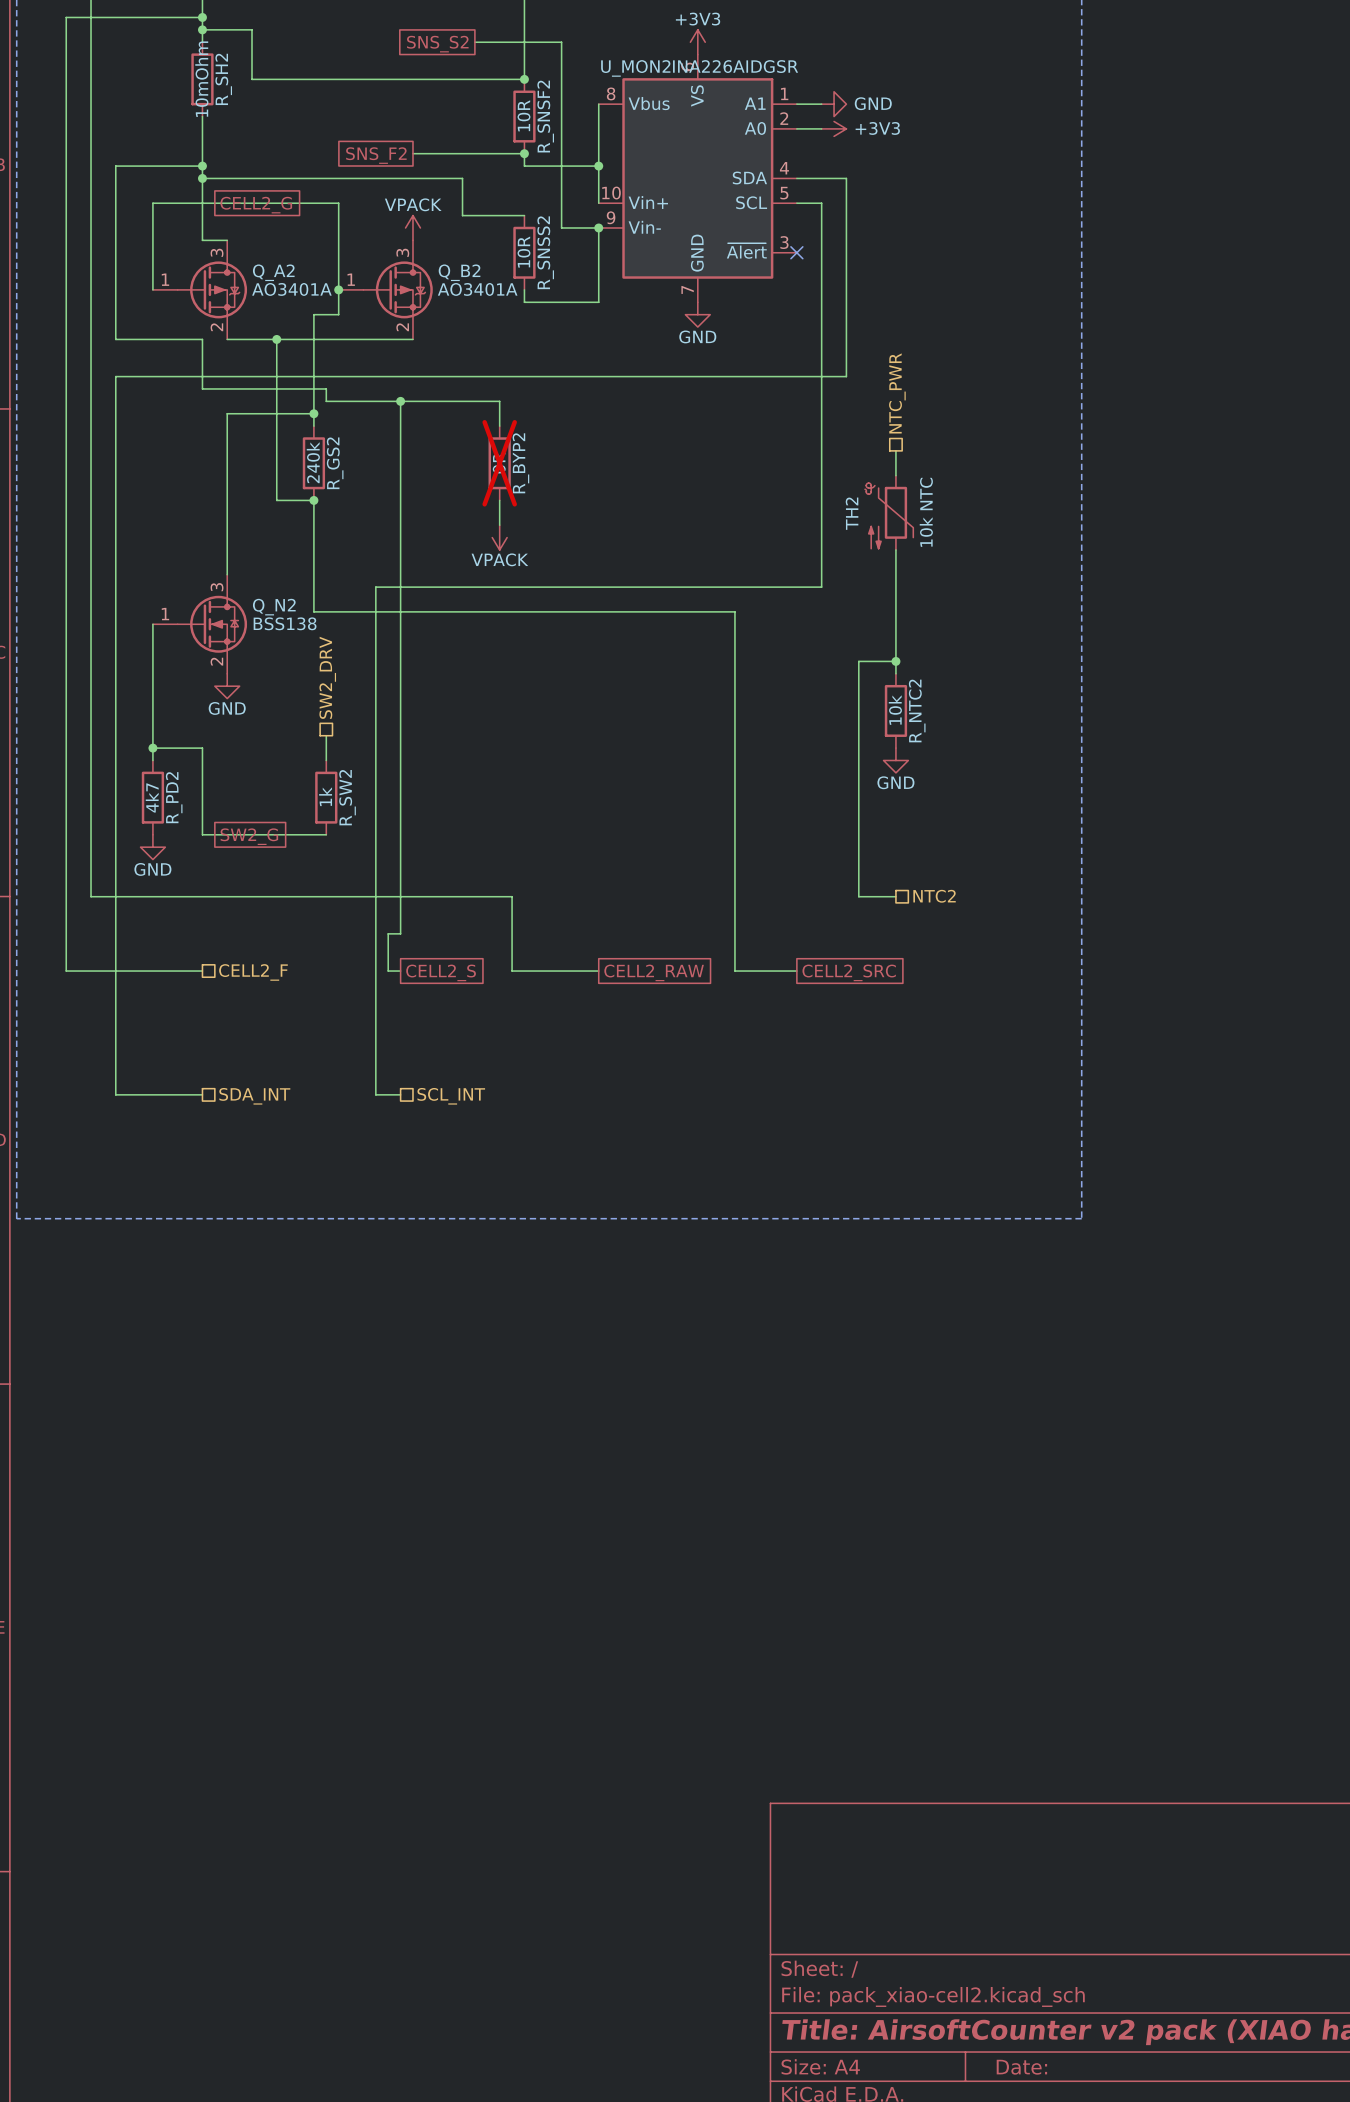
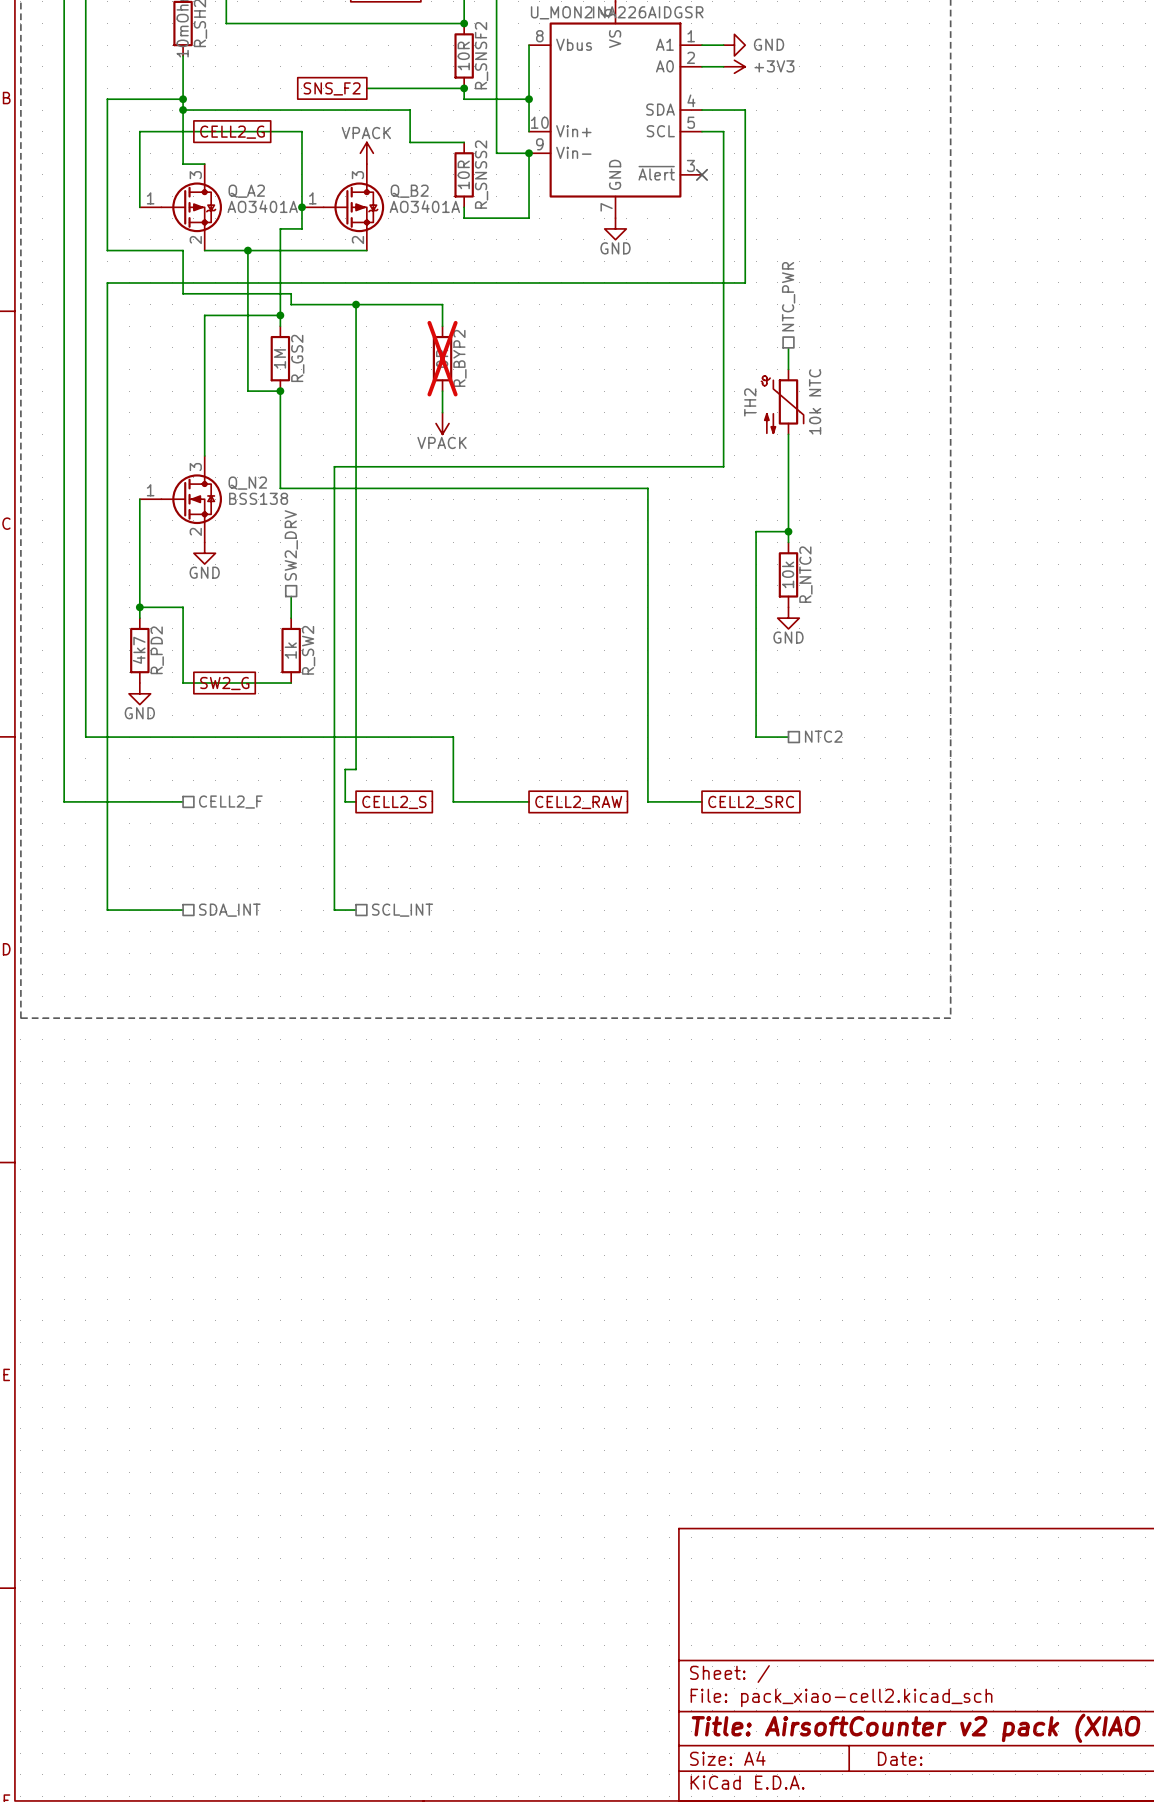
R_GS2 value: 240k (313, 462) -> 1M (279, 358)

